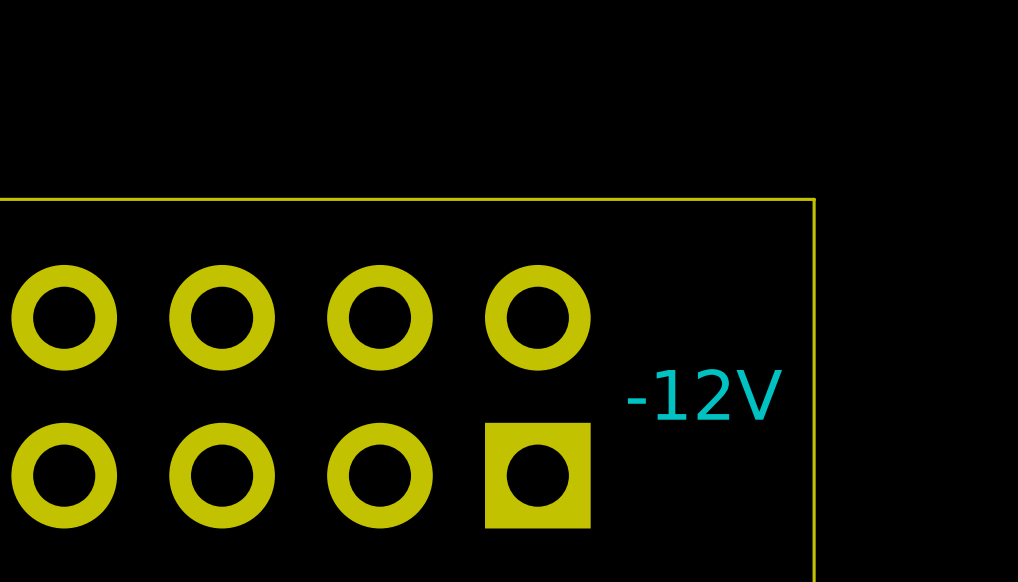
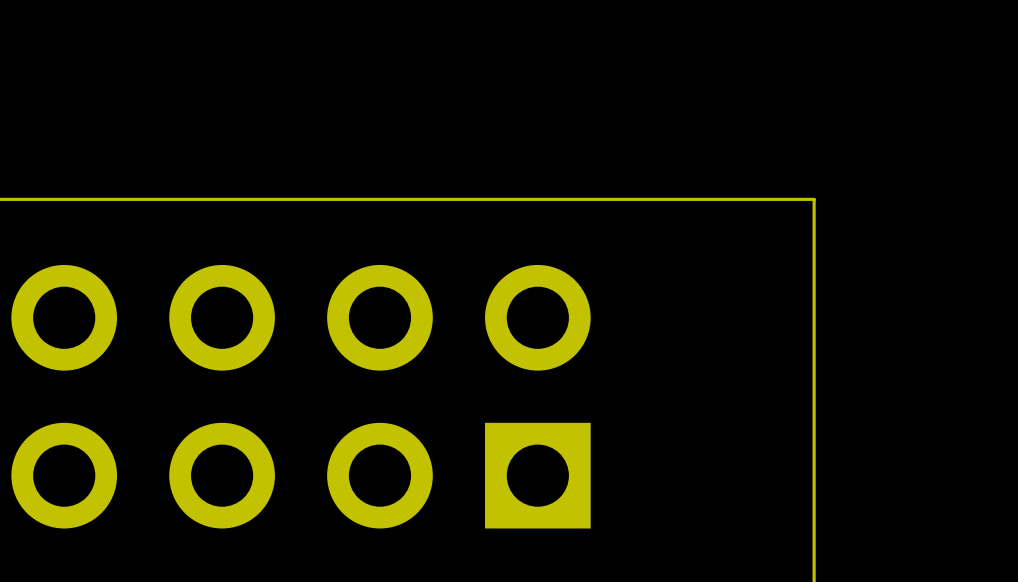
text: -12V (704, 394) -> none

